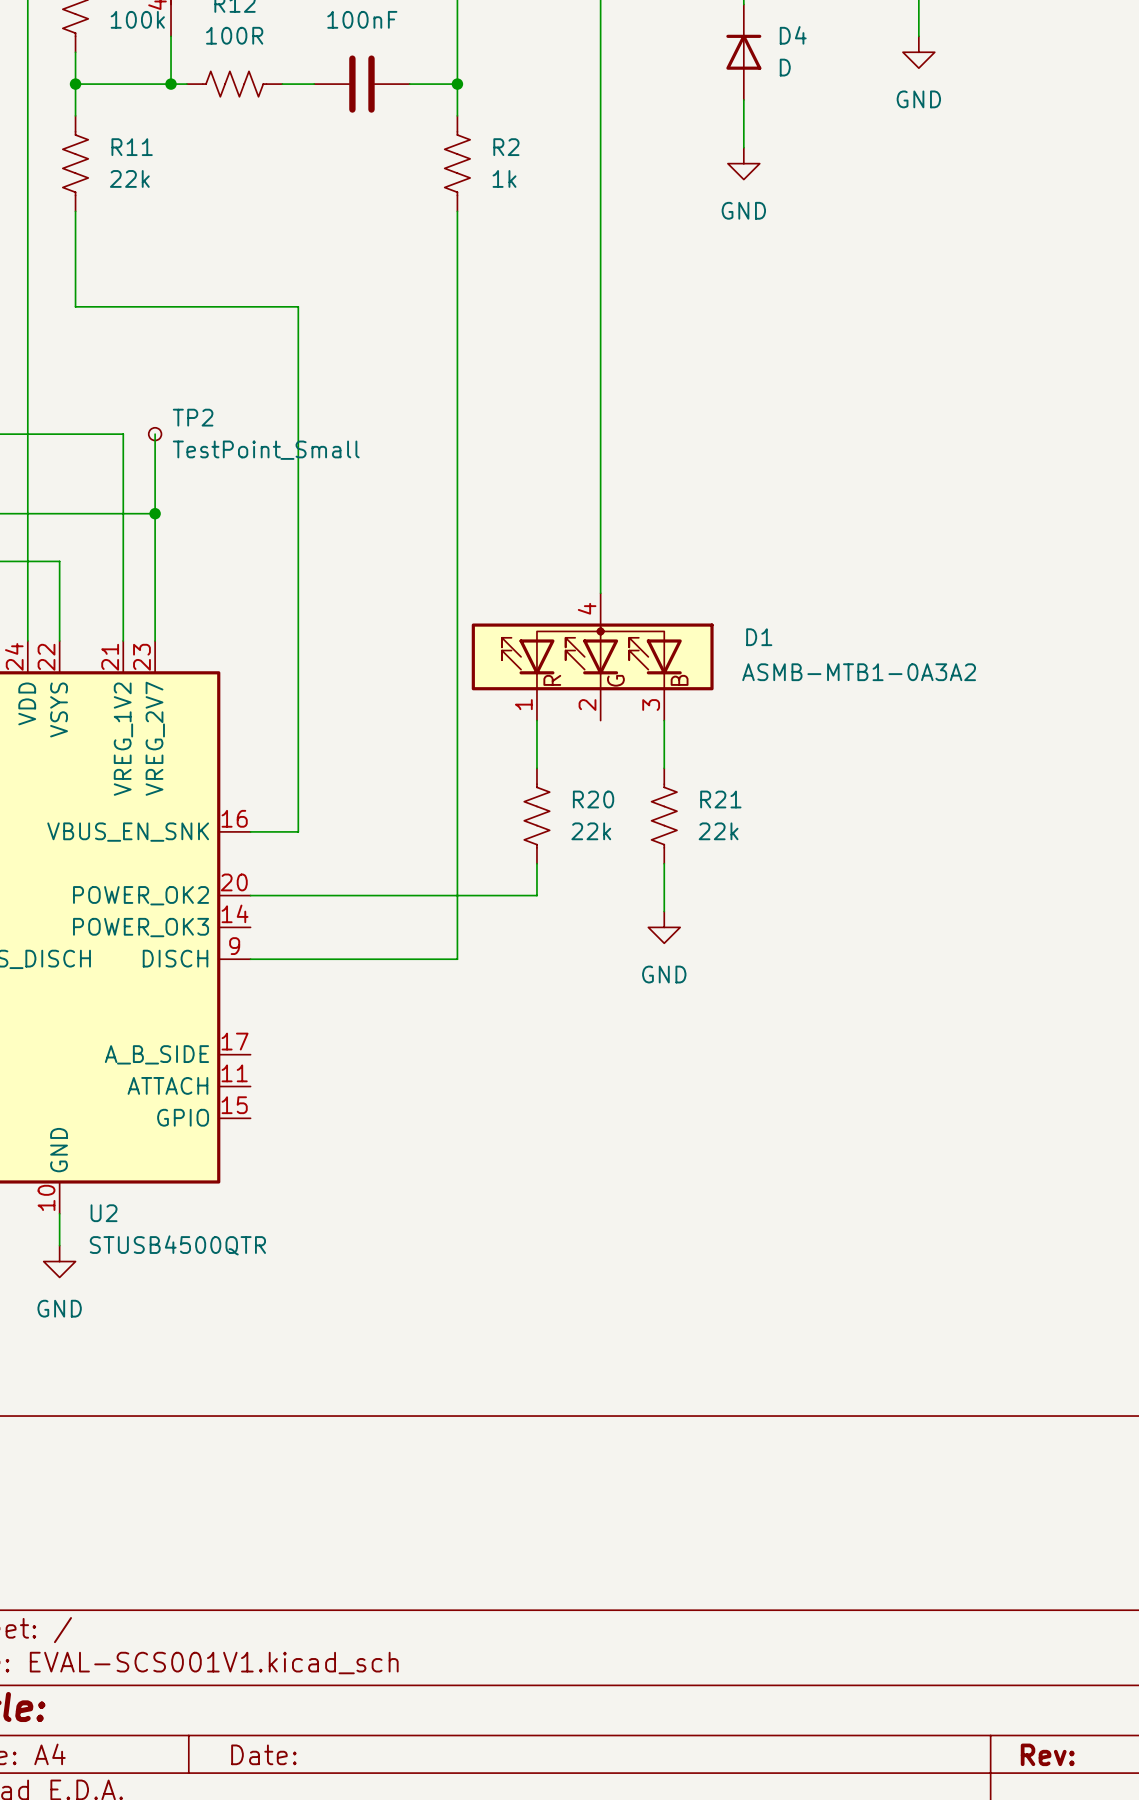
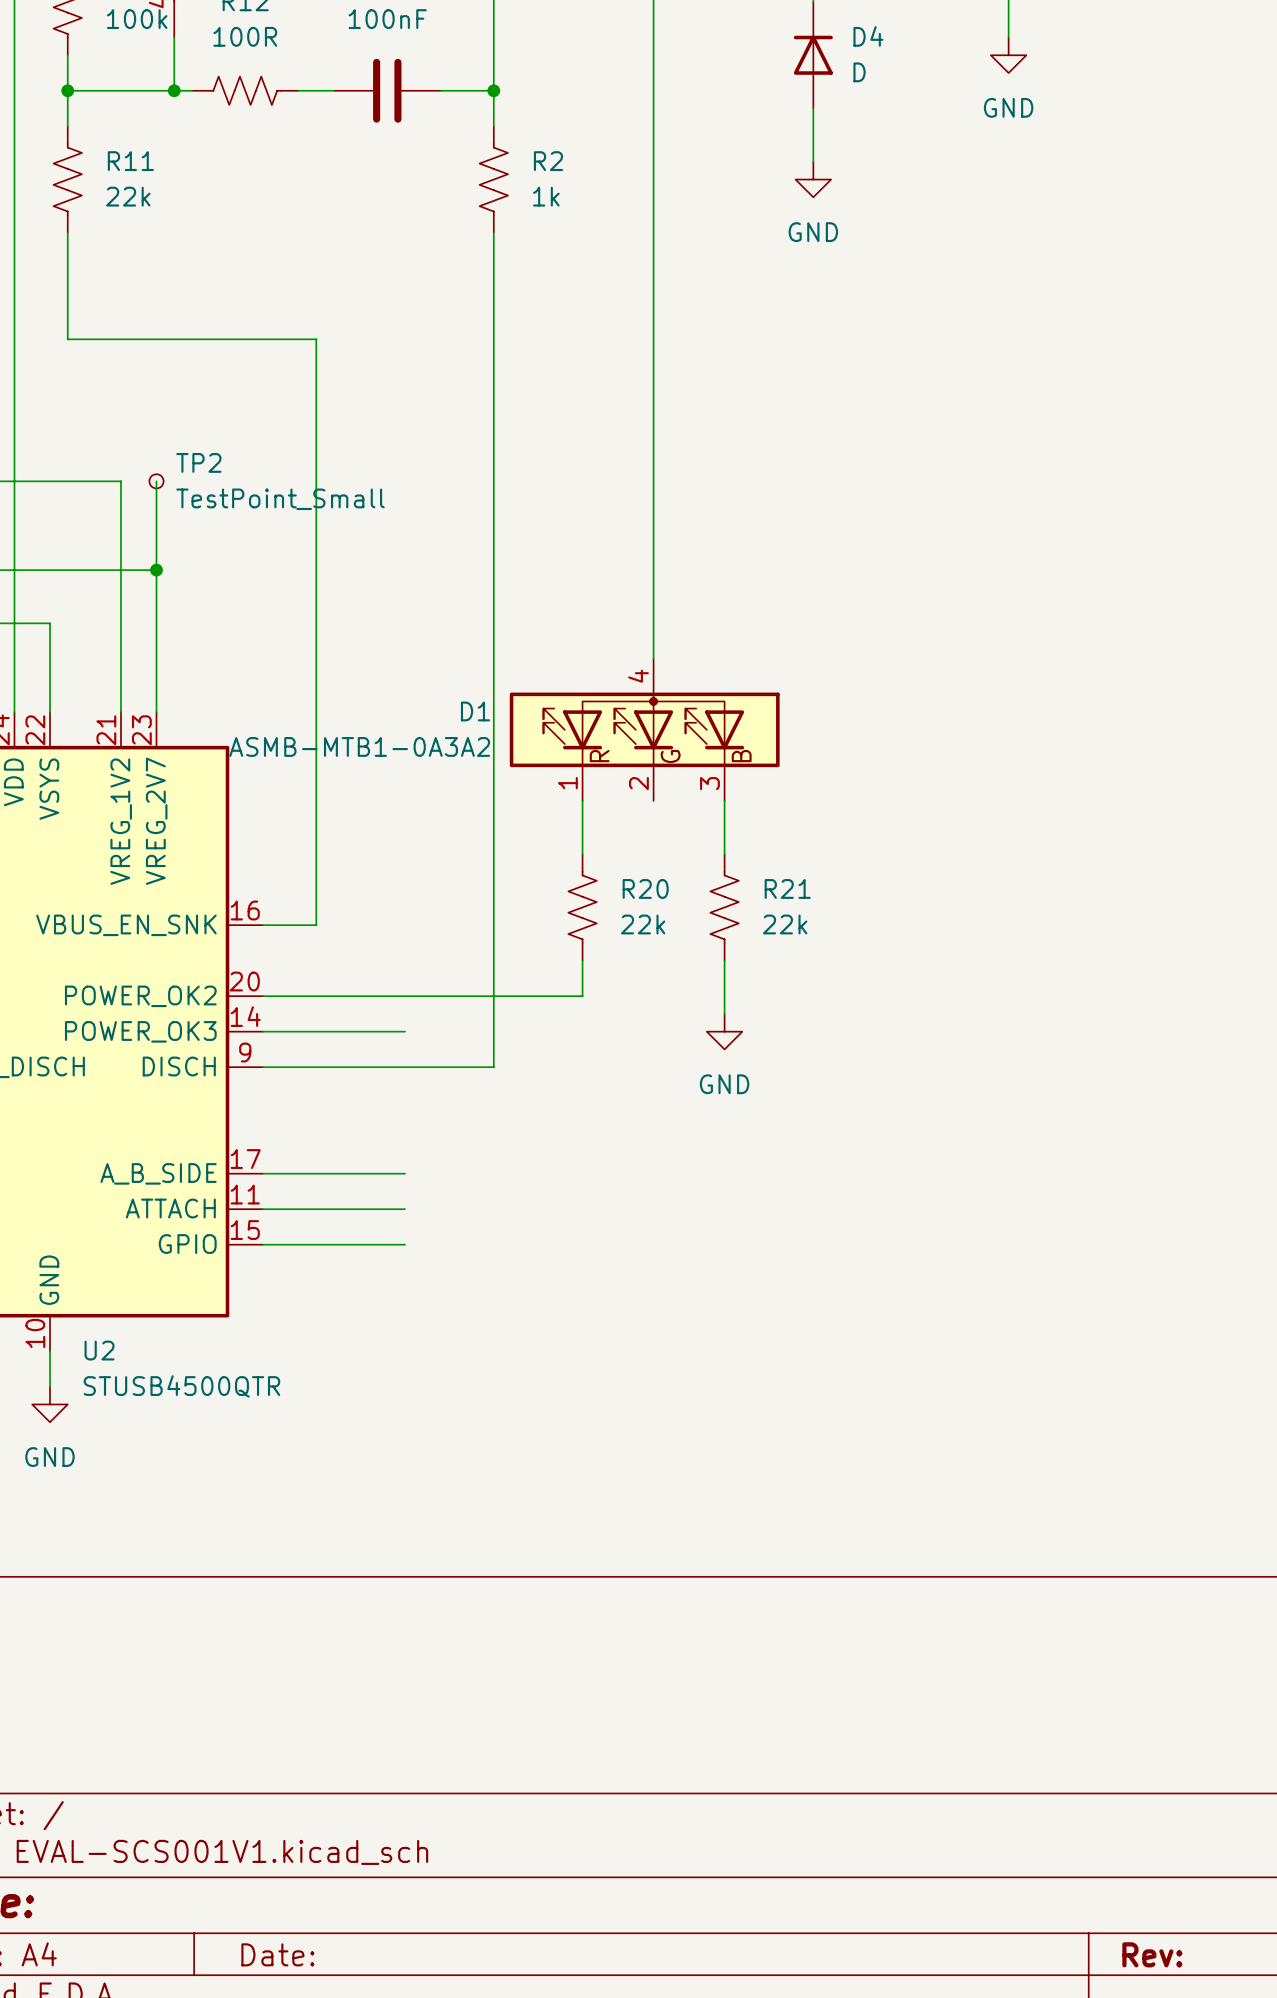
D1 name position: D1 (759, 637) -> D1 (475, 711)
D1 value position: ASMB-MTB1-0A3A2 (859, 672) -> ASMB-MTB1-0A3A2 (359, 746)
wire: none -> (263, 1031) (405, 1031)
wire: none -> (263, 1173) (405, 1173)
wire: none -> (263, 1209) (405, 1209)
wire: none -> (263, 1244) (405, 1244)

